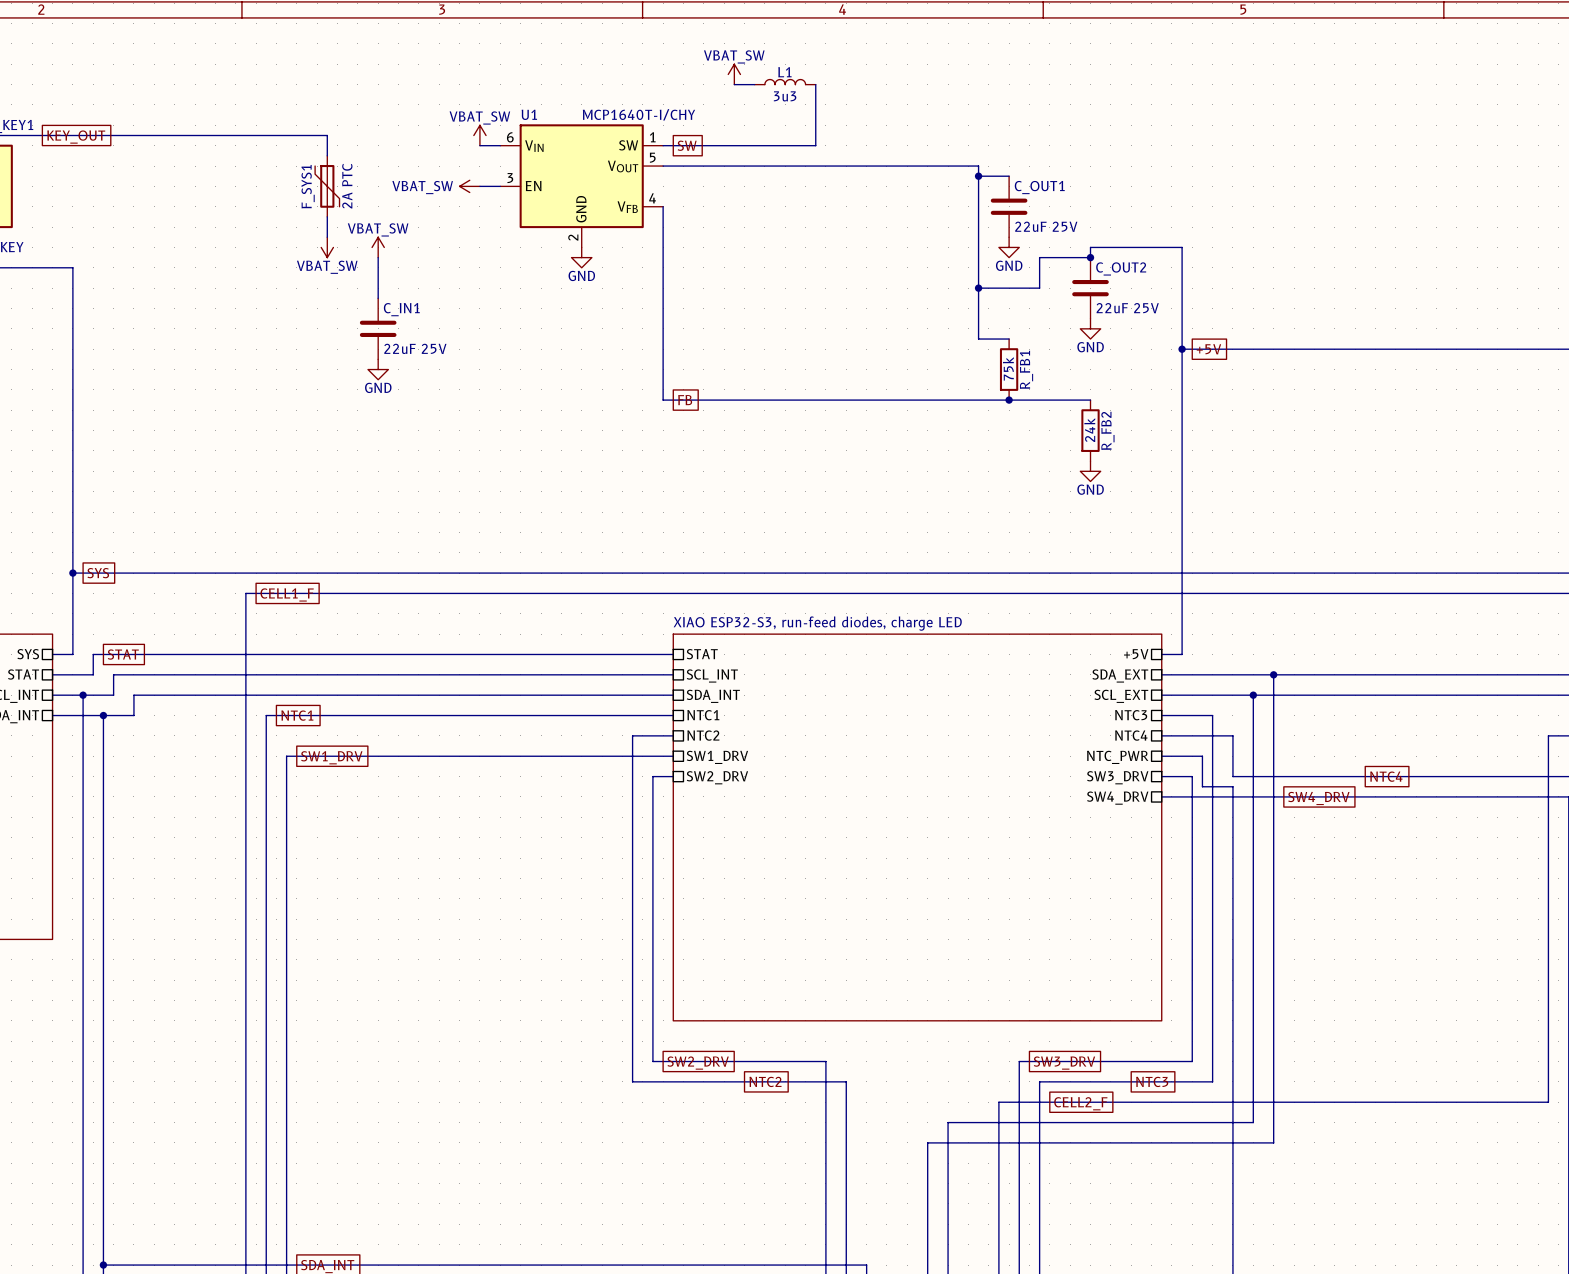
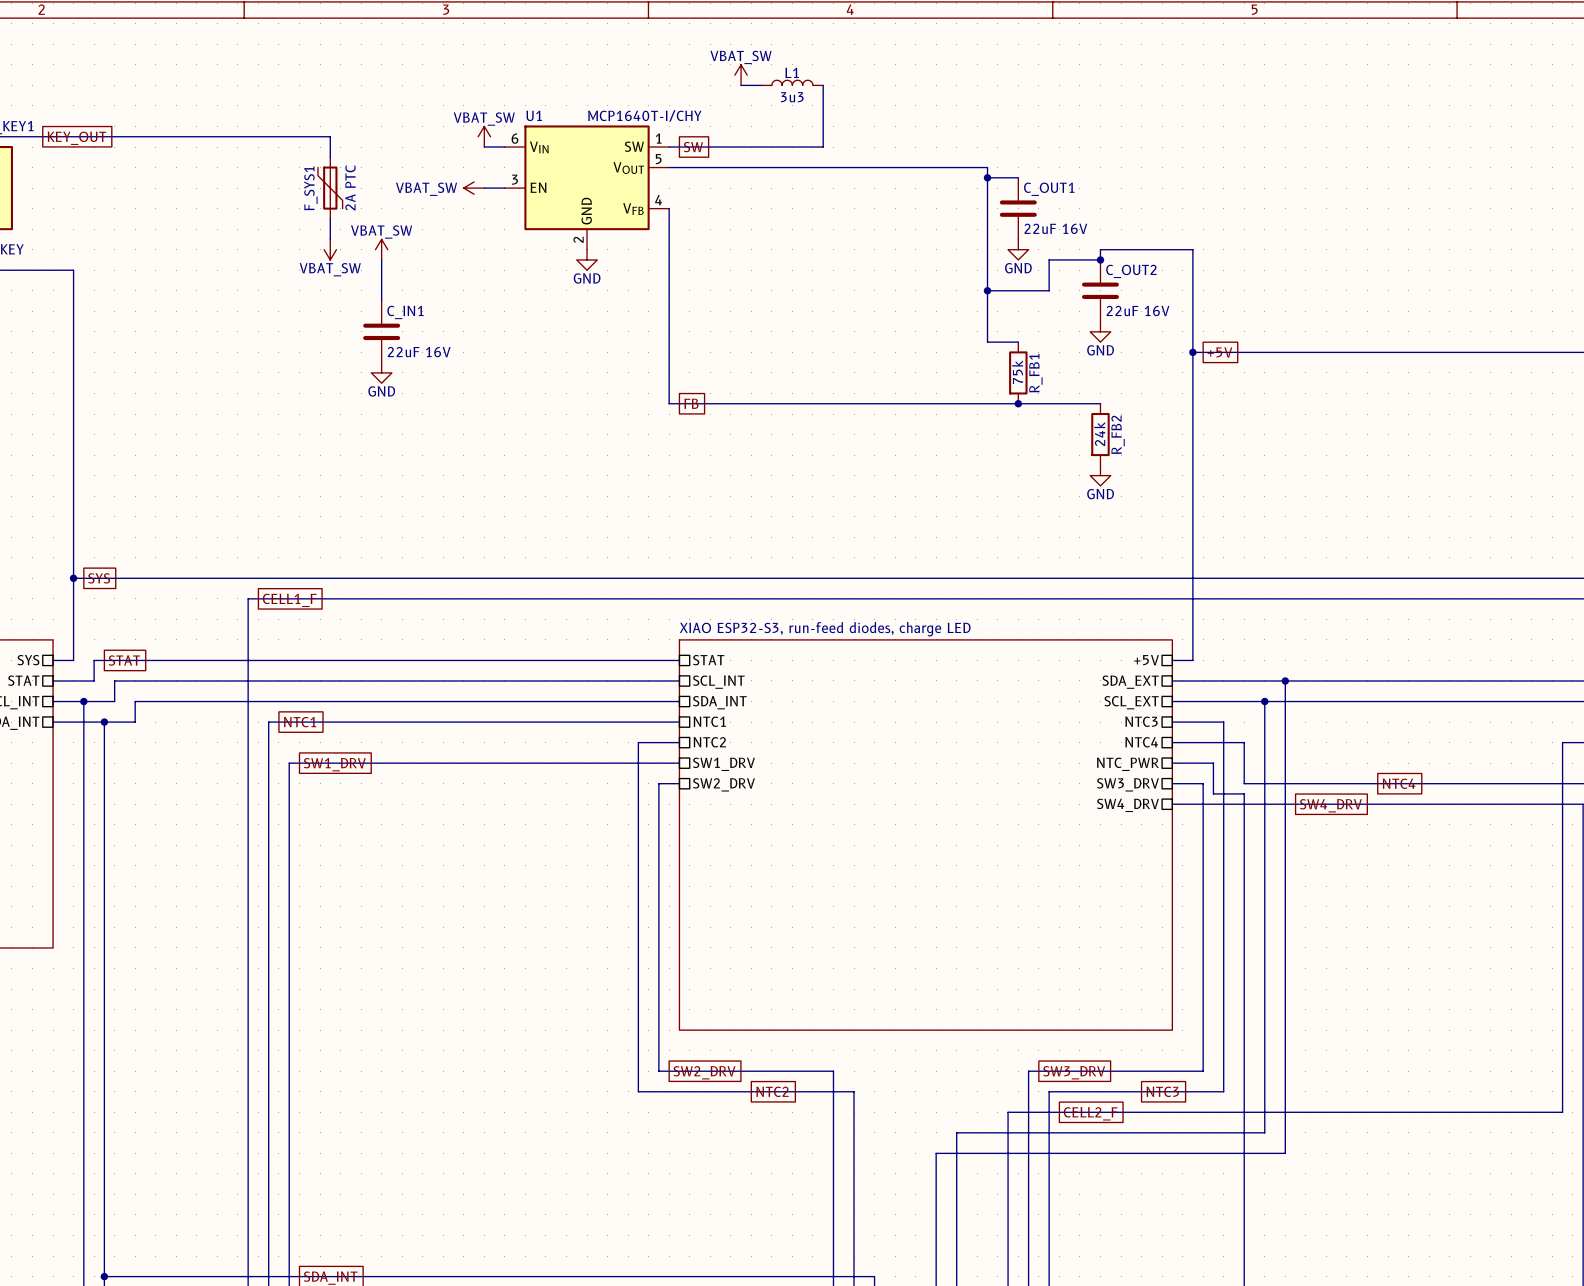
C_OUT1 value: 22uF 25V (1046, 226) -> 22uF 16V (1055, 228)
C_OUT2 value: 22uF 25V (1127, 308) -> 22uF 16V (1138, 311)
C_IN1 value: 22uF 25V (415, 348) -> 22uF 16V (419, 352)

